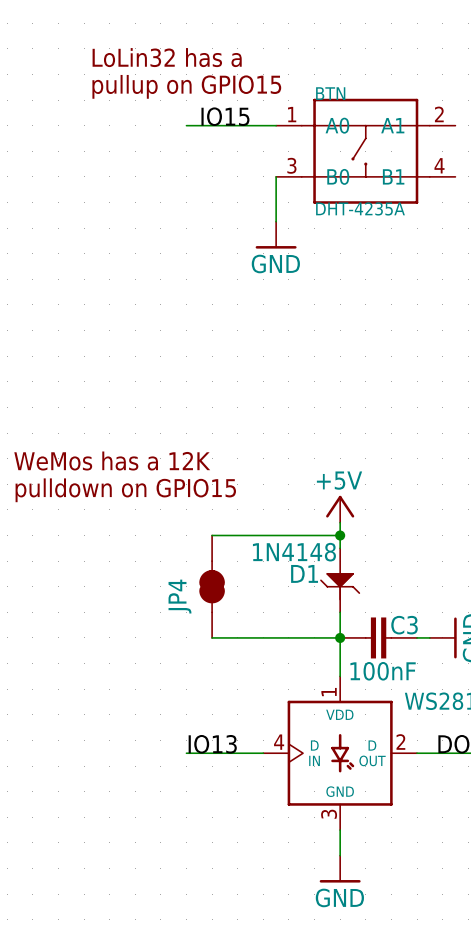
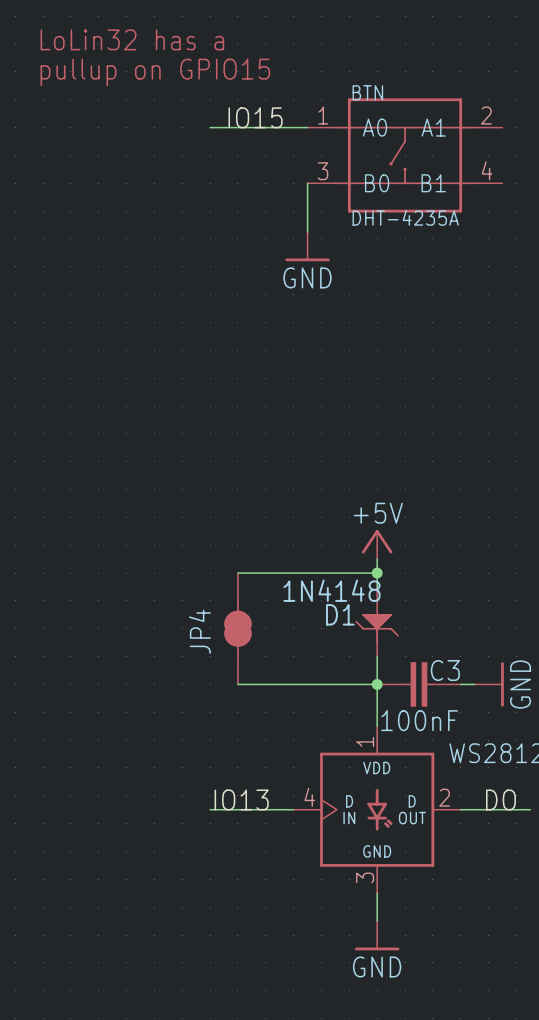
text position: LoLin32 has a (167, 57) -> LoLin32 has a (132, 39)
text position: pullup on GPIO15 (186, 86) -> pullup on GPIO15 (155, 72)
text: WeMos has a 12K (112, 461) -> none
text: pulldown on GPIO15 (125, 490) -> none

